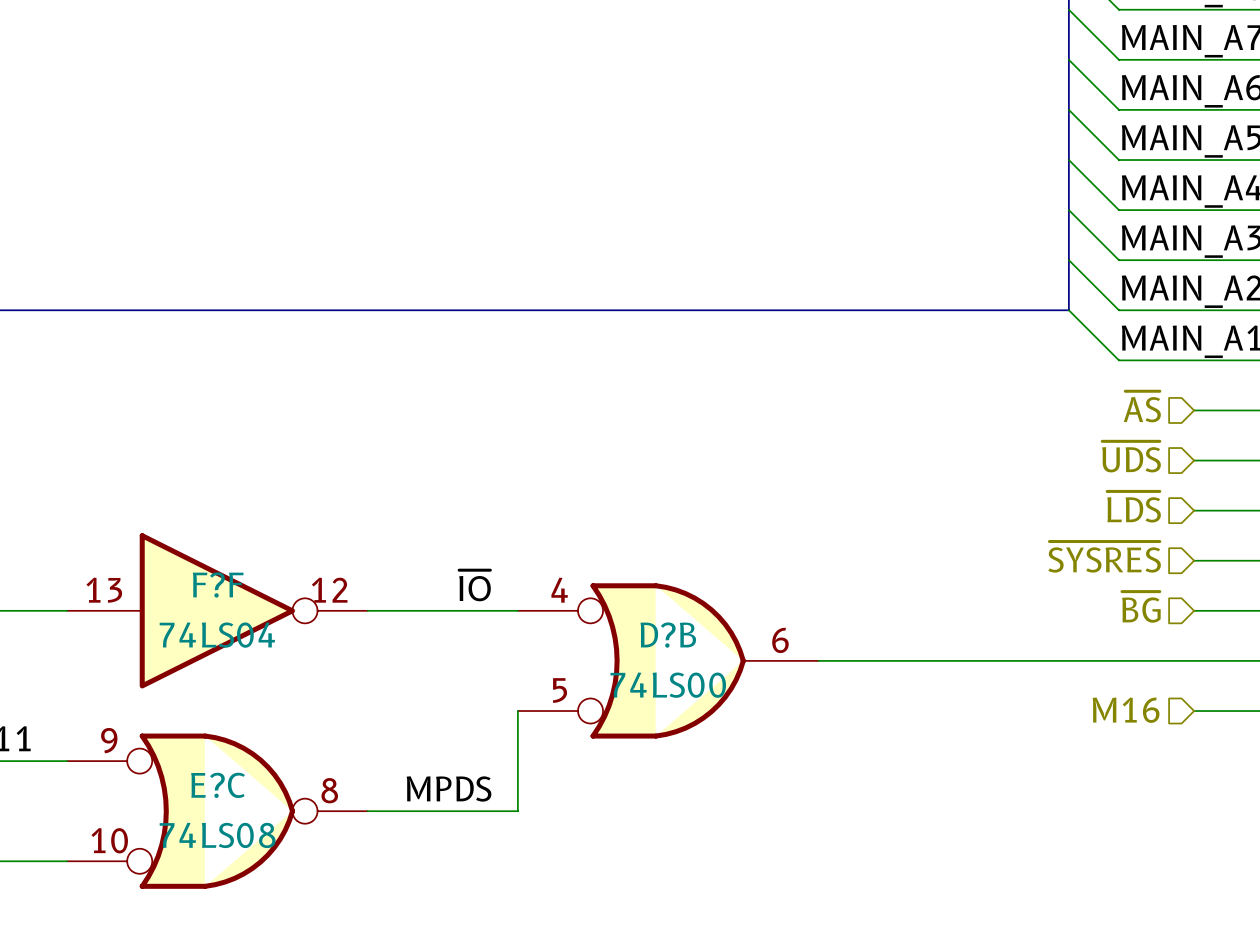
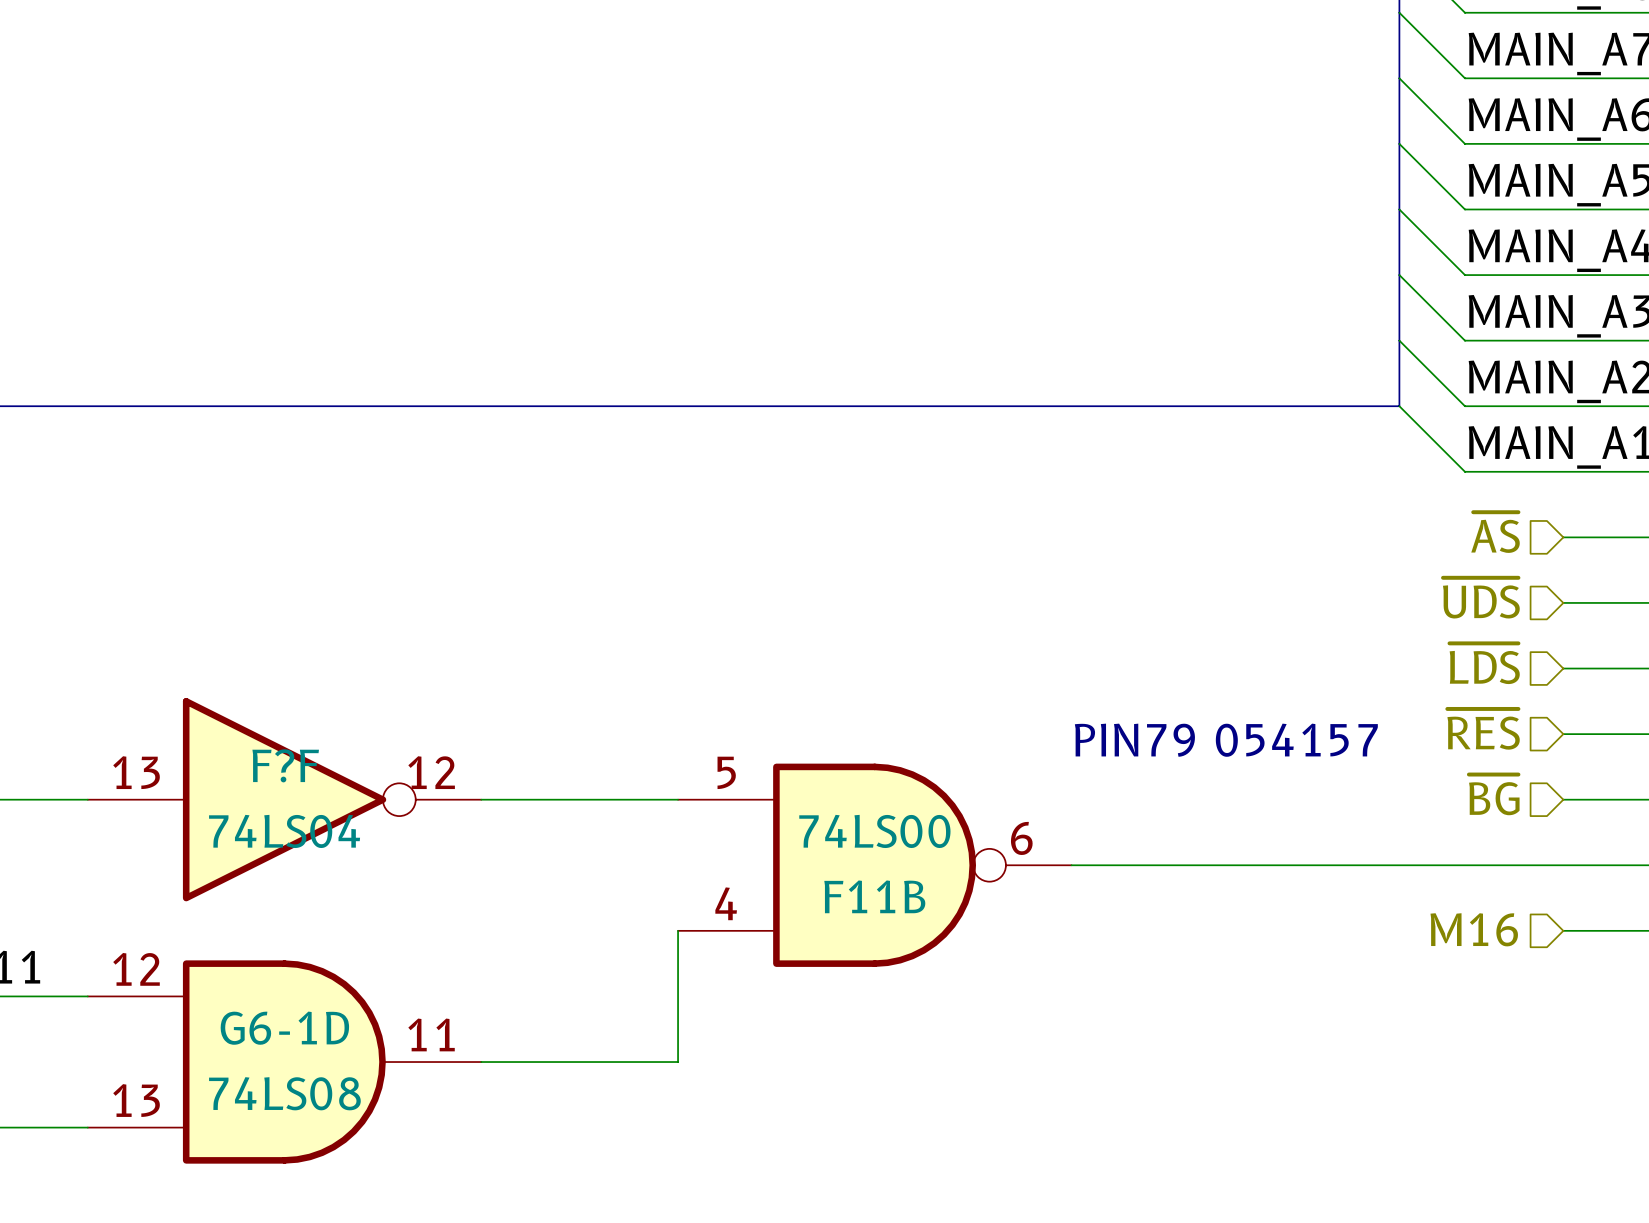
hierarchical label: ~{SYSRES} (1104, 557) -> ~{RES} (1483, 729)
text: none -> PIN79 054157 (1226, 740)
label: ~{IO} (474, 585) -> none
D?B: 74LS00 (668, 660) -> none
F11B: none -> 74LS00 (874, 865)
label: MPDS (449, 788) -> none
E?C: 74LS08 (217, 811) -> none
G6-1D: none -> 74LS08 (284, 1062)

